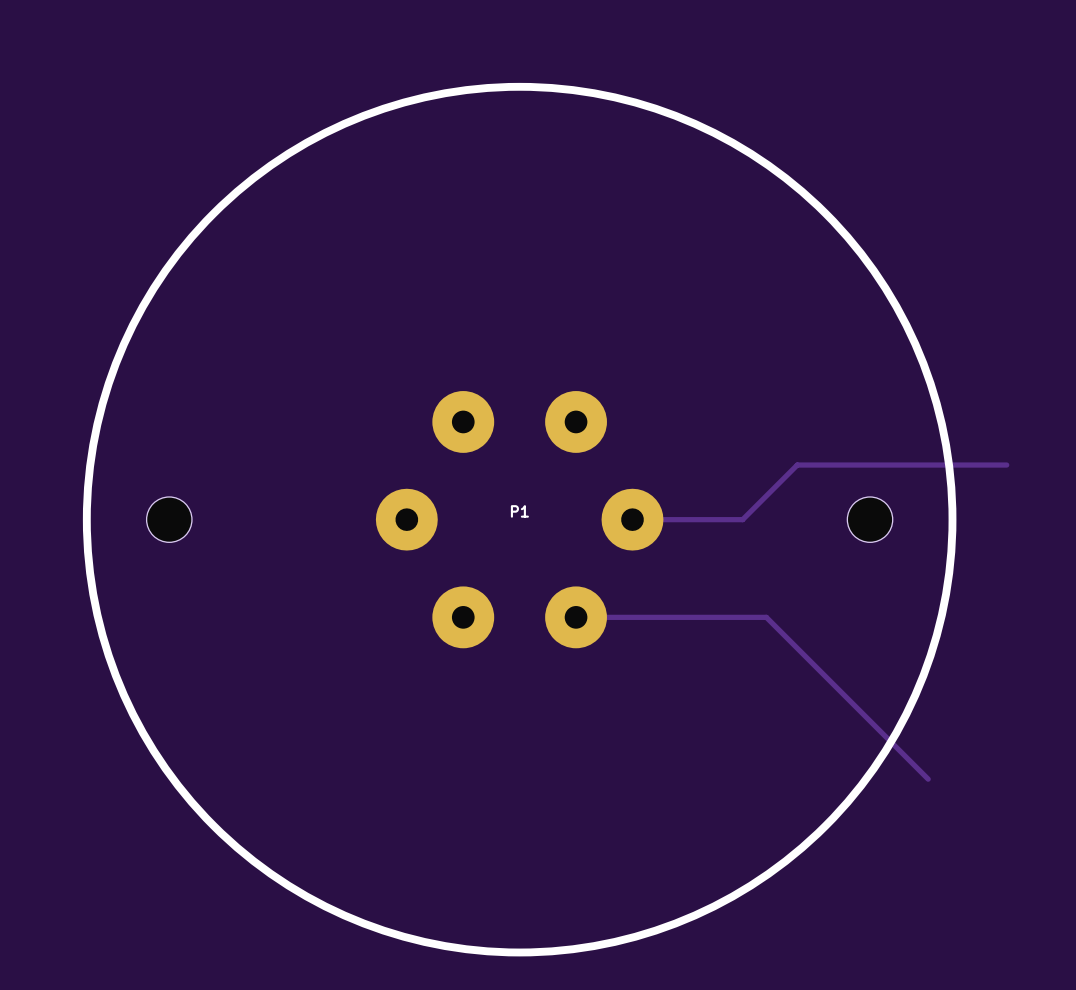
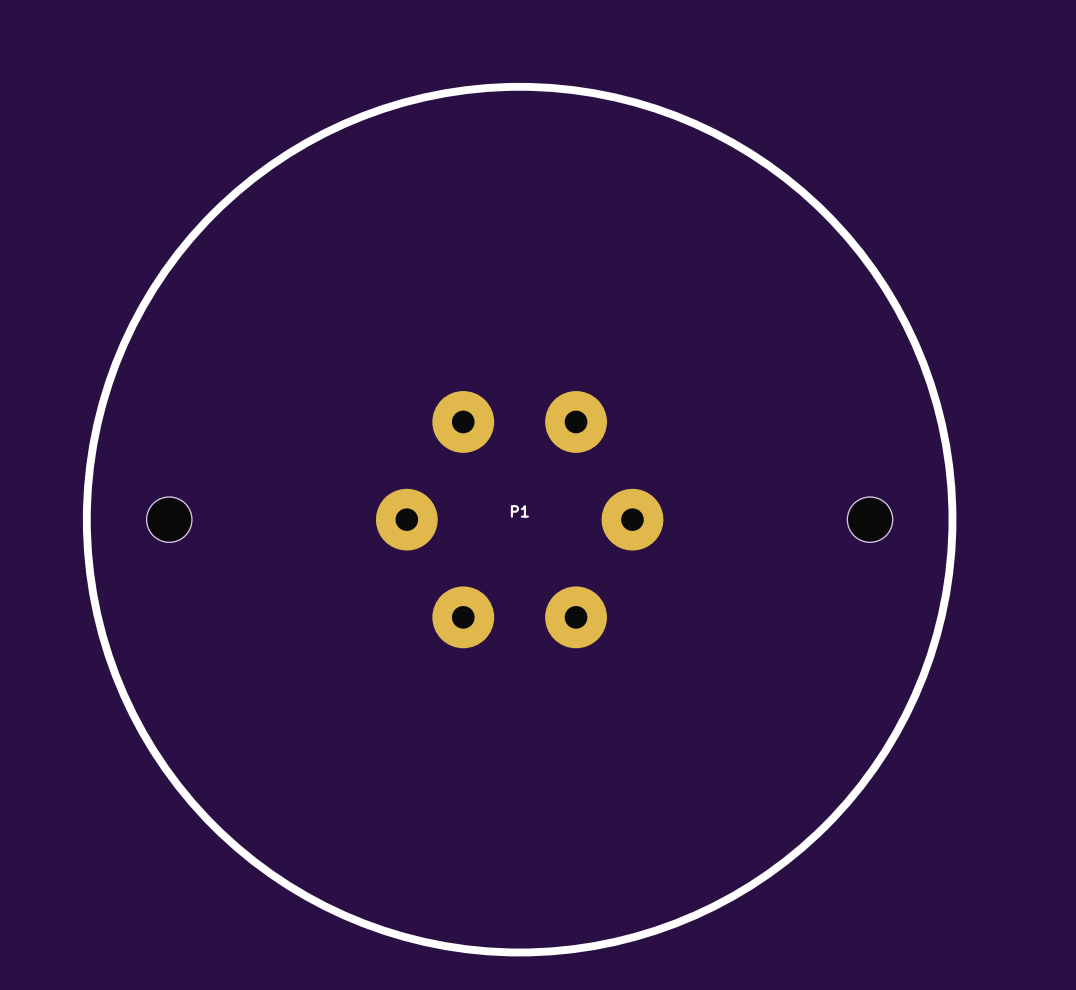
track: (1006, 465) (797, 465) (742, 519) (632, 519) -> none
track: (576, 617) (766, 617) (928, 779) -> none

